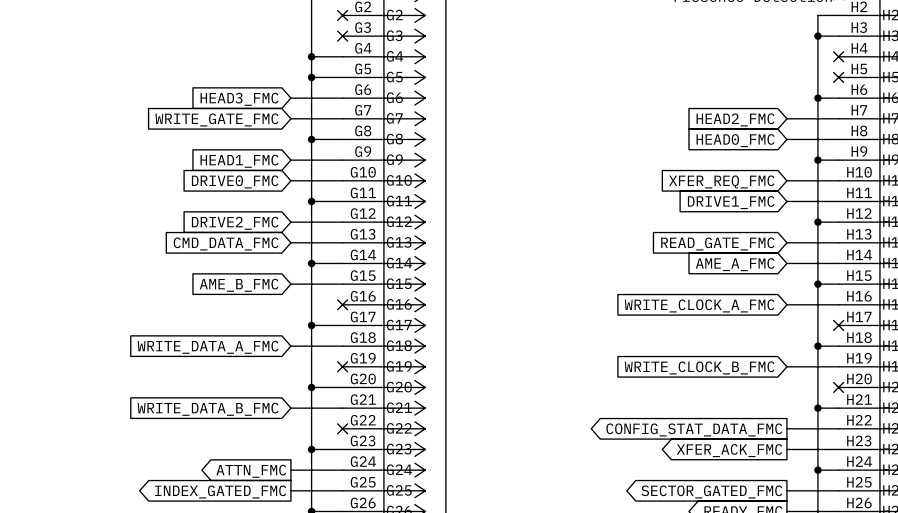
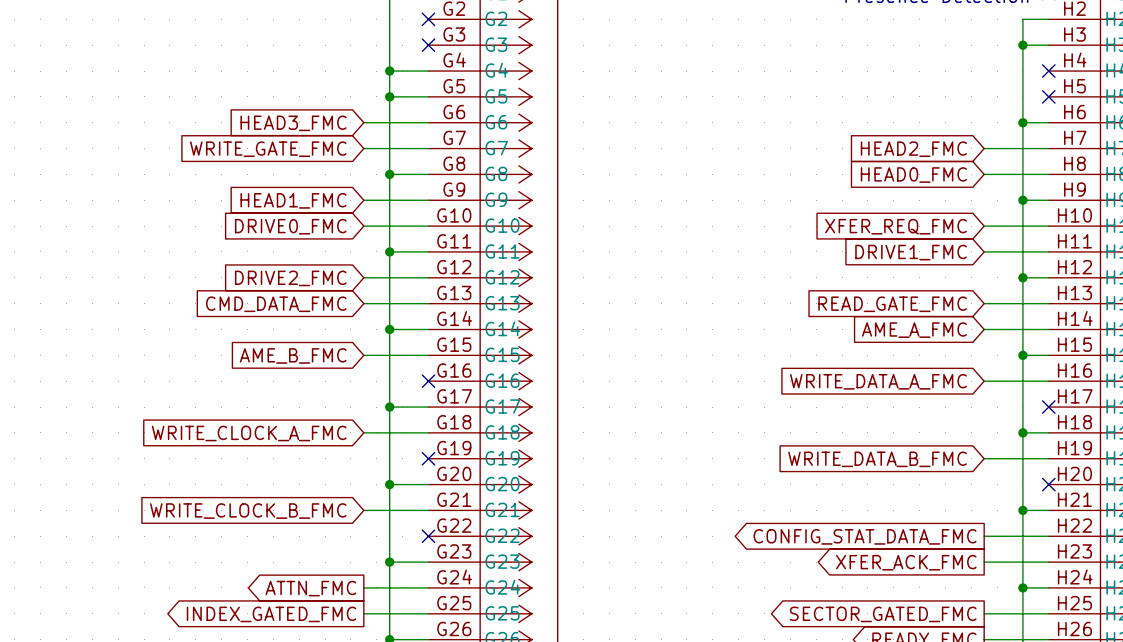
global label: WRITE_CLOCK_A_FMC (699, 305) -> WRITE_DATA_A_FMC (878, 381)
global label: WRITE_DATA_A_FMC (208, 347) -> WRITE_CLOCK_A_FMC (249, 433)
global label: WRITE_CLOCK_B_FMC (699, 367) -> WRITE_DATA_B_FMC (877, 459)
global label: WRITE_DATA_B_FMC (208, 409) -> WRITE_CLOCK_B_FMC (248, 511)

